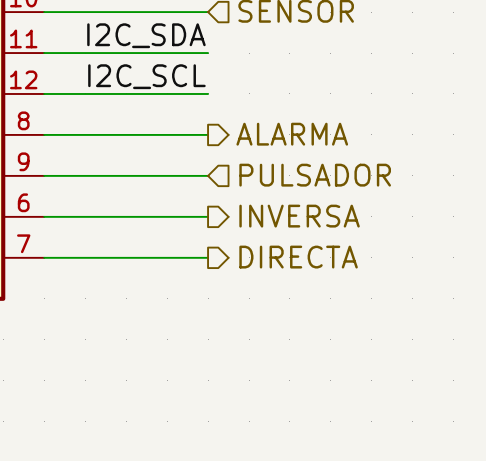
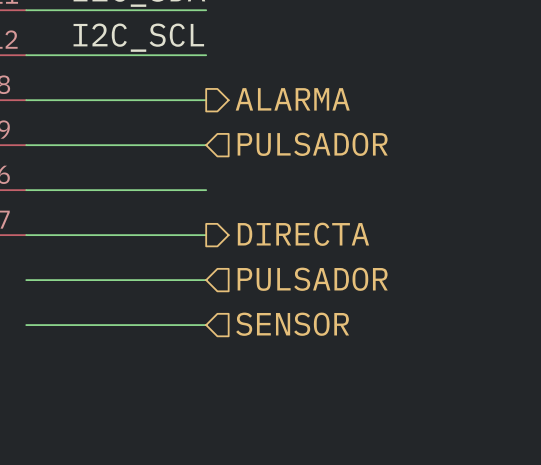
hierarchical label: INVERSA (299, 216) -> none
wire: none -> (26, 280) (206, 280)
hierarchical label: none -> PULSADOR (312, 279)
hierarchical label: none -> SENSOR (292, 324)
wire: none -> (26, 325) (206, 325)

